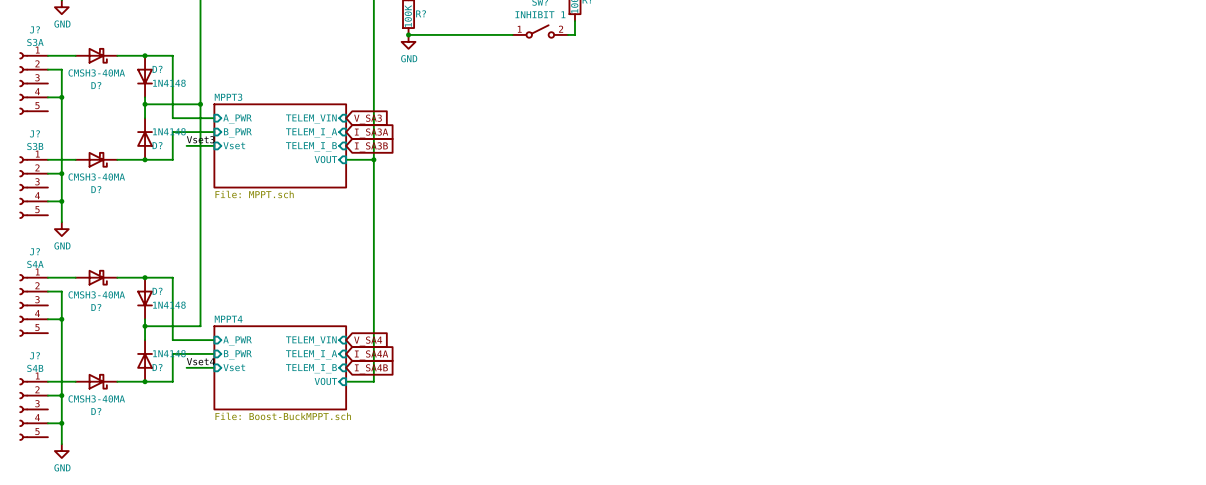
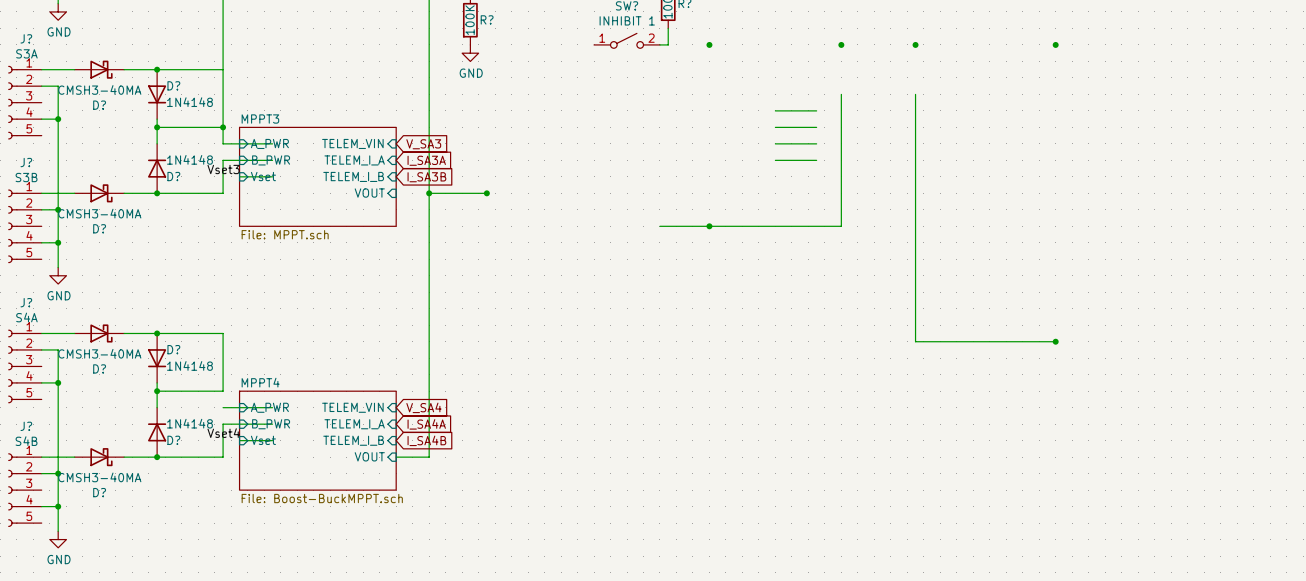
wire: (408, 34) (512, 34) -> none
junction: (408, 34) -> none
junction: none -> (709, 44)
junction: none -> (841, 44)
junction: none -> (915, 44)
junction: none -> (1055, 44)
wire: (172, 55) (172, 118) (200, 118) (200, 132) (172, 132) (172, 159) -> (190, 69) (223, 69)
wire: none -> (841, 94) (841, 226) (659, 226)
wire: none -> (915, 94) (915, 341) (1055, 341)
wire: none -> (775, 110) (816, 110)
wire: none -> (775, 127) (816, 127)
wire: none -> (239, 143) (272, 143)
wire: none -> (775, 143) (816, 143)
wire: none -> (239, 160) (272, 160)
wire: none -> (775, 160) (816, 160)
wire: (186, 145) (214, 145) -> (272, 176) (239, 176)
wire: (200, 159) (200, 277) -> (223, 193) (190, 193)
wire: (346, 159) (373, 159) -> (486, 193) (429, 193)
junction: none -> (486, 193)
junction: none -> (709, 226)
wire: (172, 277) (172, 340) (200, 340) -> (190, 333) (223, 333)
junction: none -> (1055, 341)
wire: none -> (239, 407) (272, 407)
wire: (200, 353) (172, 353) (172, 381) -> (223, 424) (223, 457) (190, 457)
wire: none -> (239, 424) (272, 424)
wire: (186, 367) (214, 367) -> (272, 440) (239, 440)

